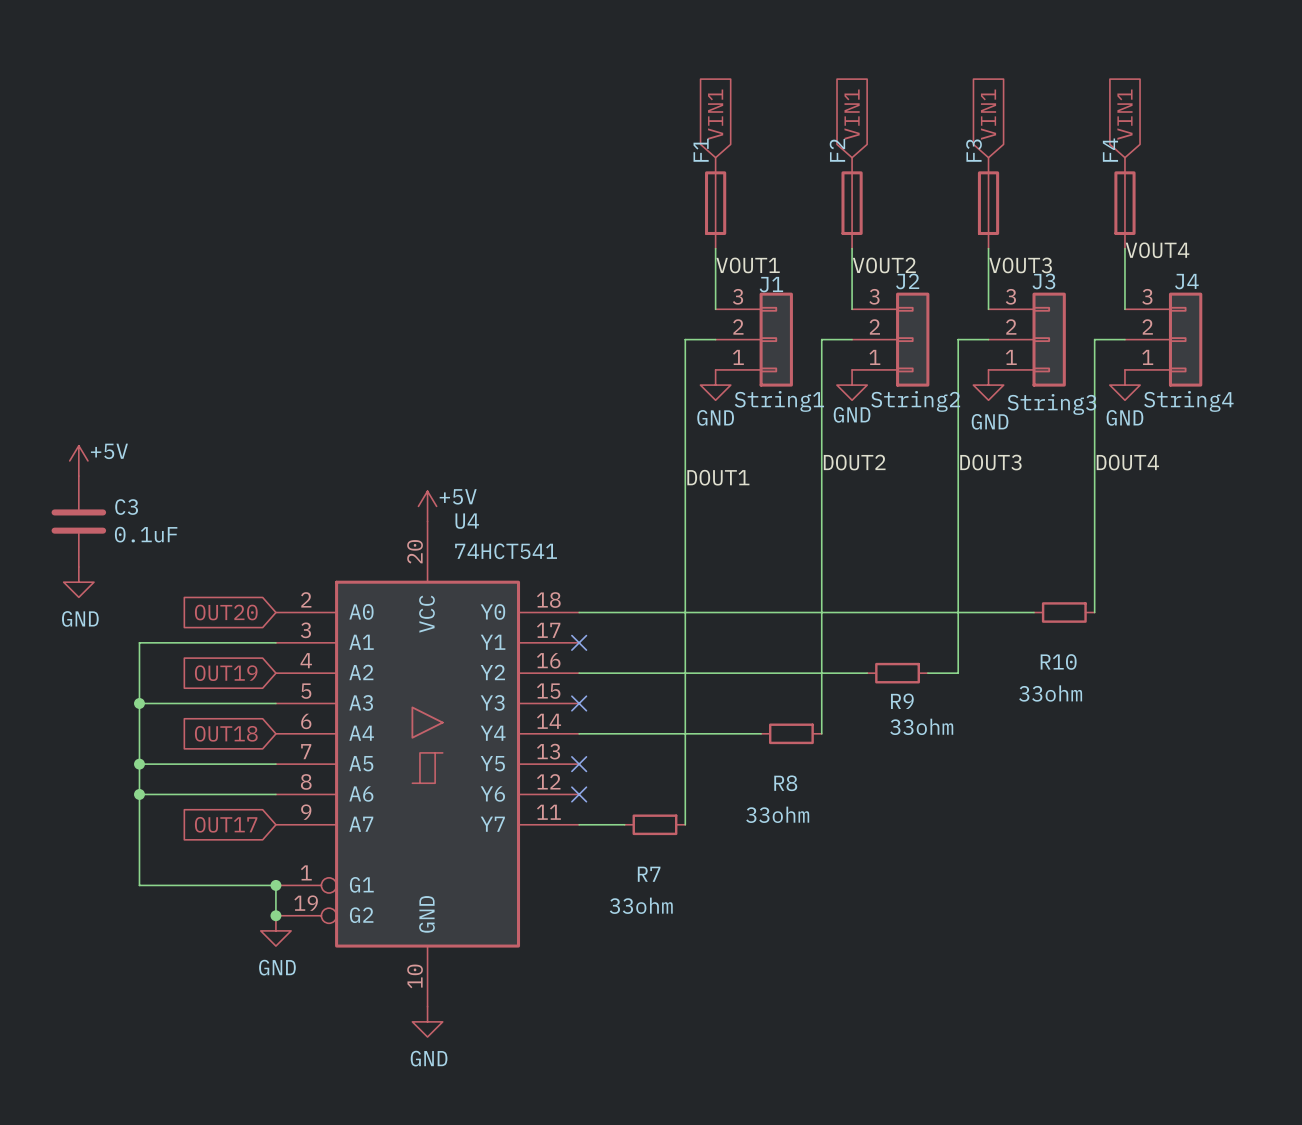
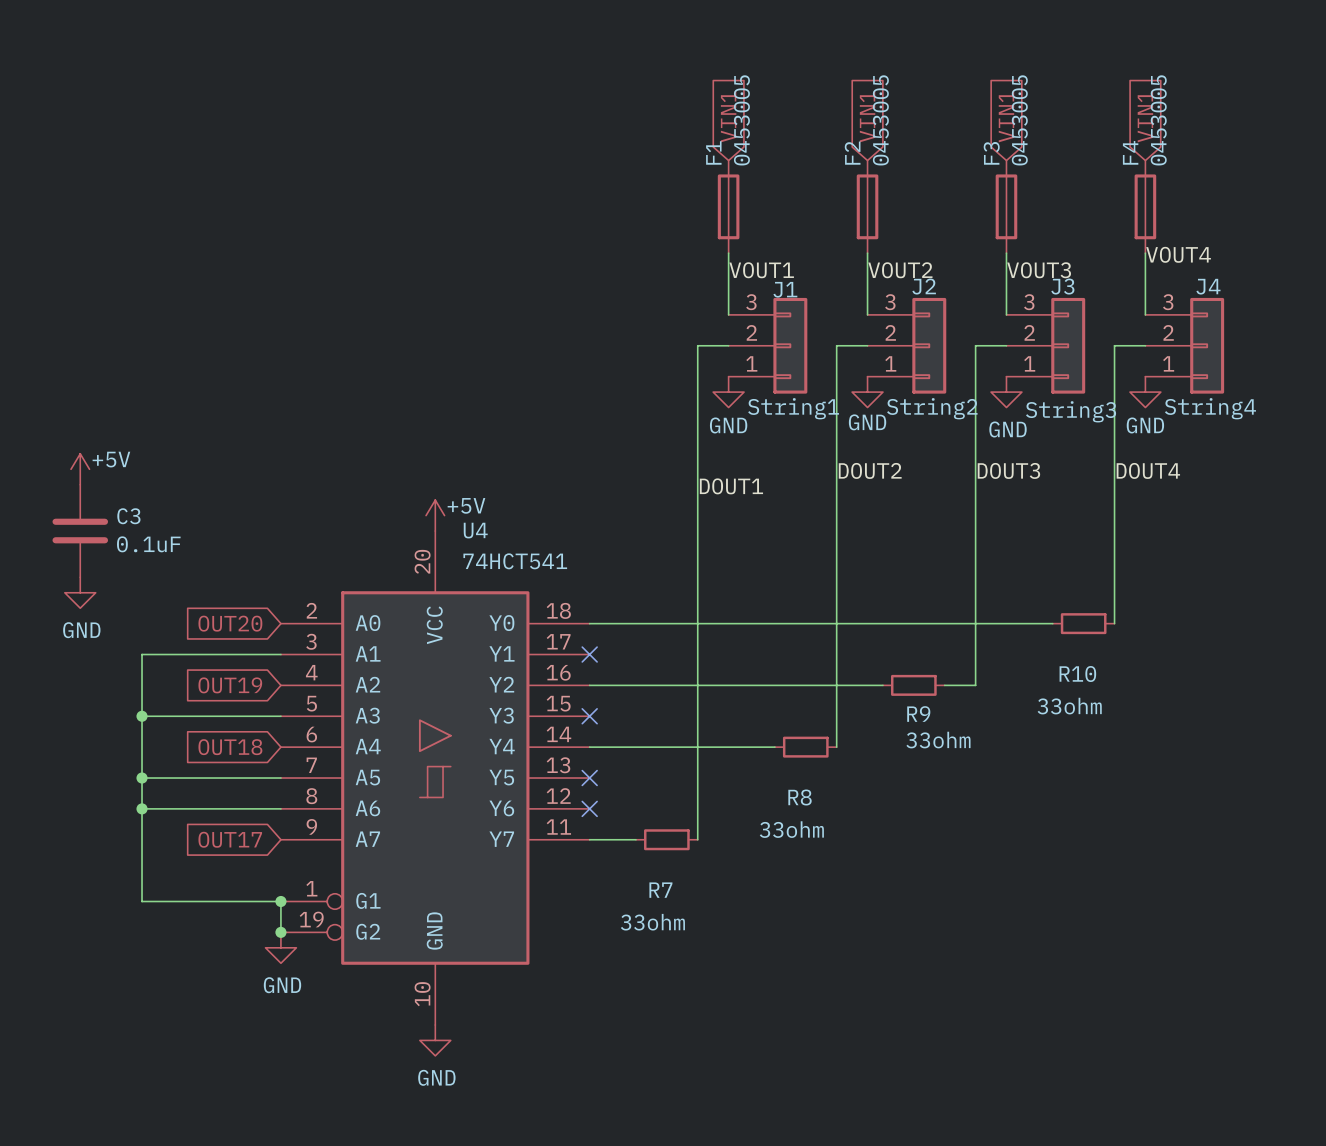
F1 value: none -> 0453005 (741, 120)
F2 value: none -> 0453005 (880, 120)
F3 value: none -> 0453005 (1019, 120)
F4 value: none -> 0453005 (1158, 120)

